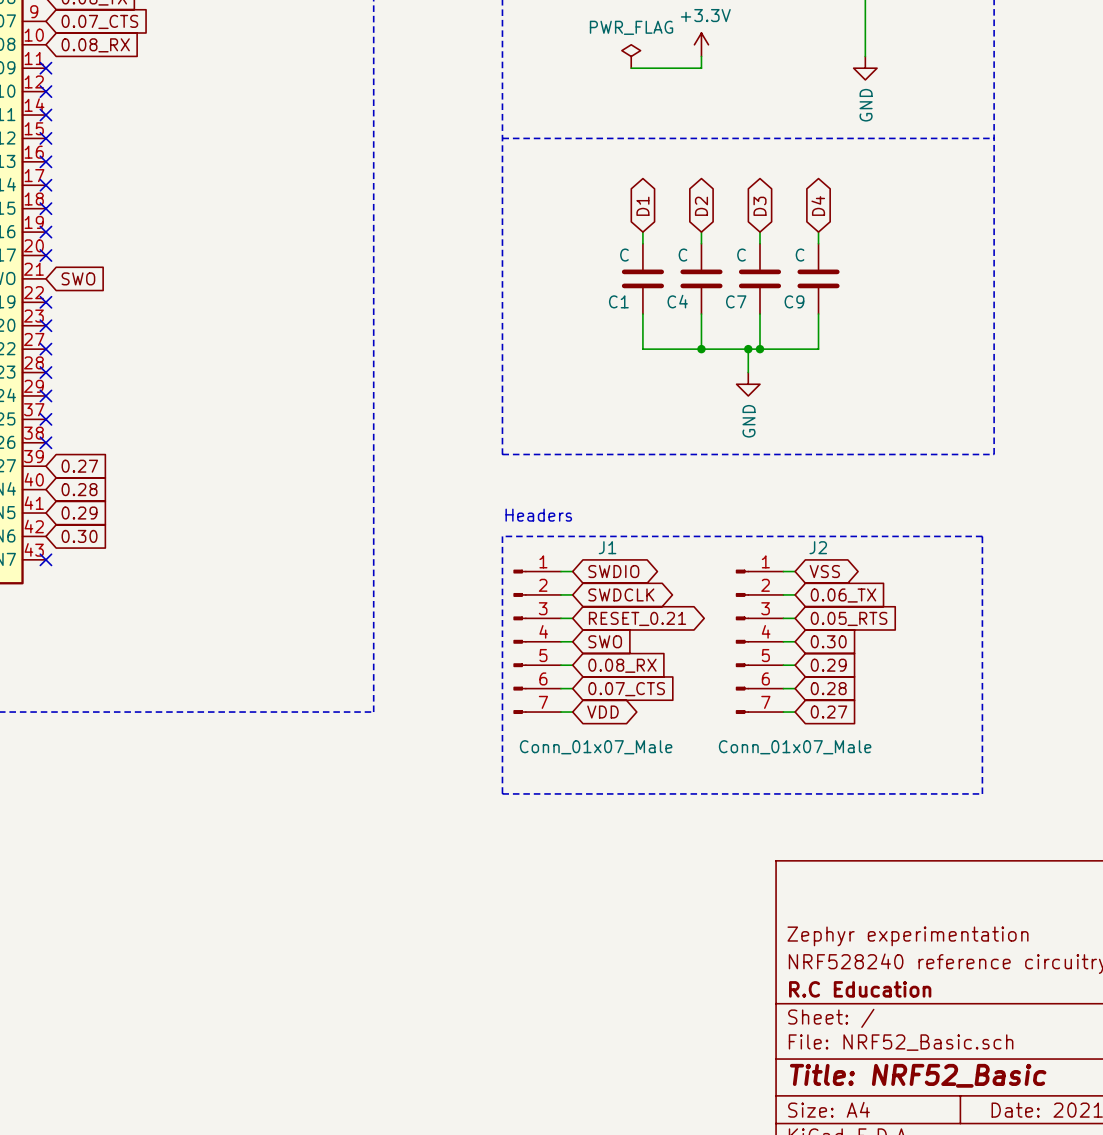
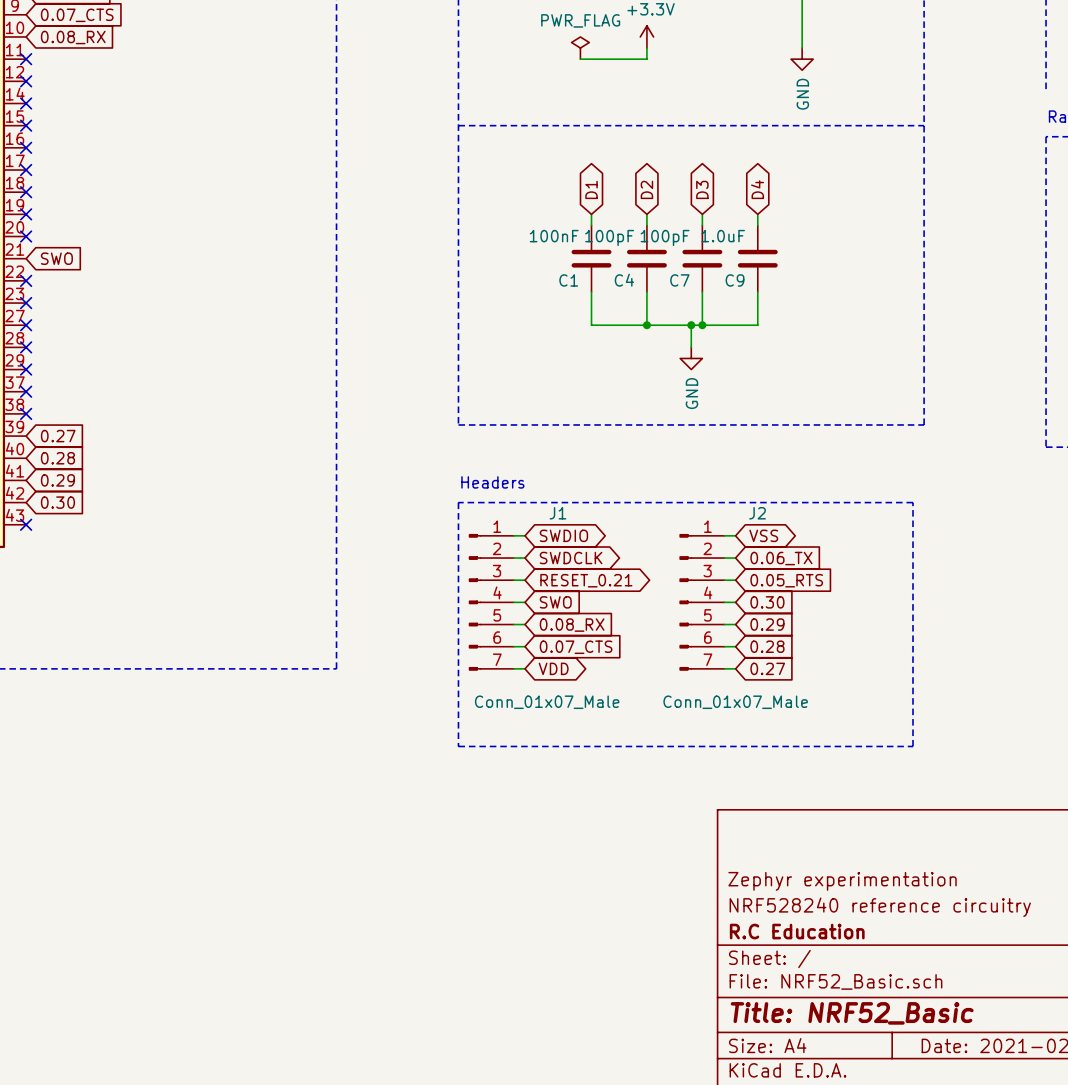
C1 value: C (624, 255) -> 100nF (554, 236)
C4 value: C (682, 255) -> 100pF (609, 237)
C7 value: C (741, 255) -> 100pF (665, 237)
C9 value: C (800, 255) -> 1.0uF (723, 236)

